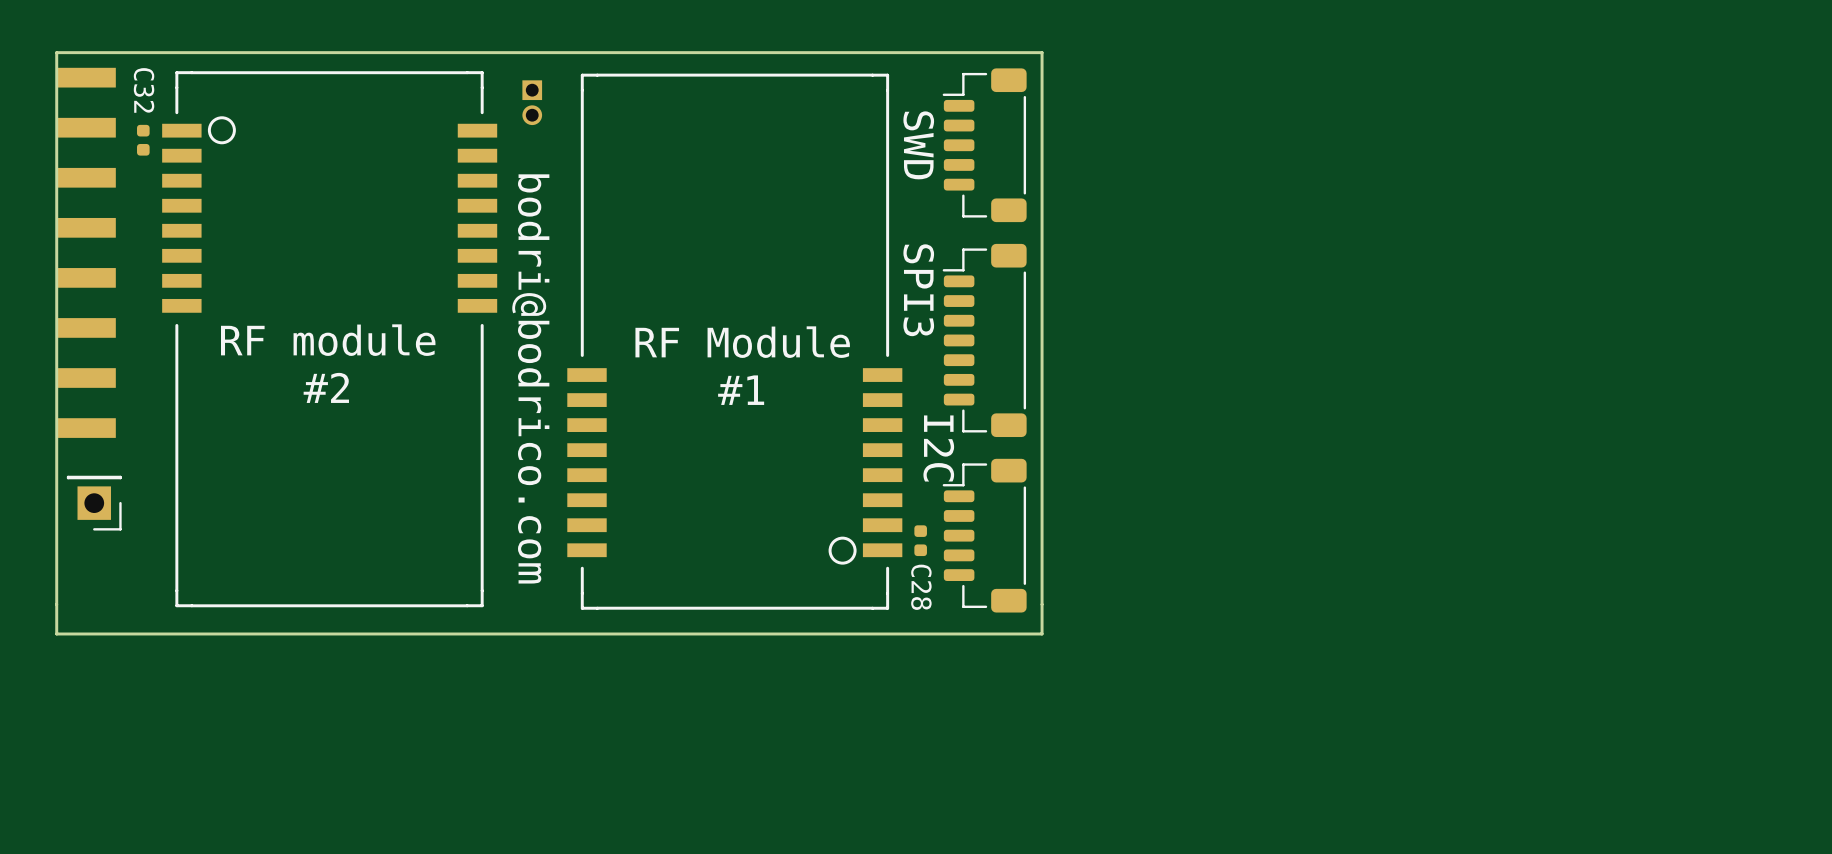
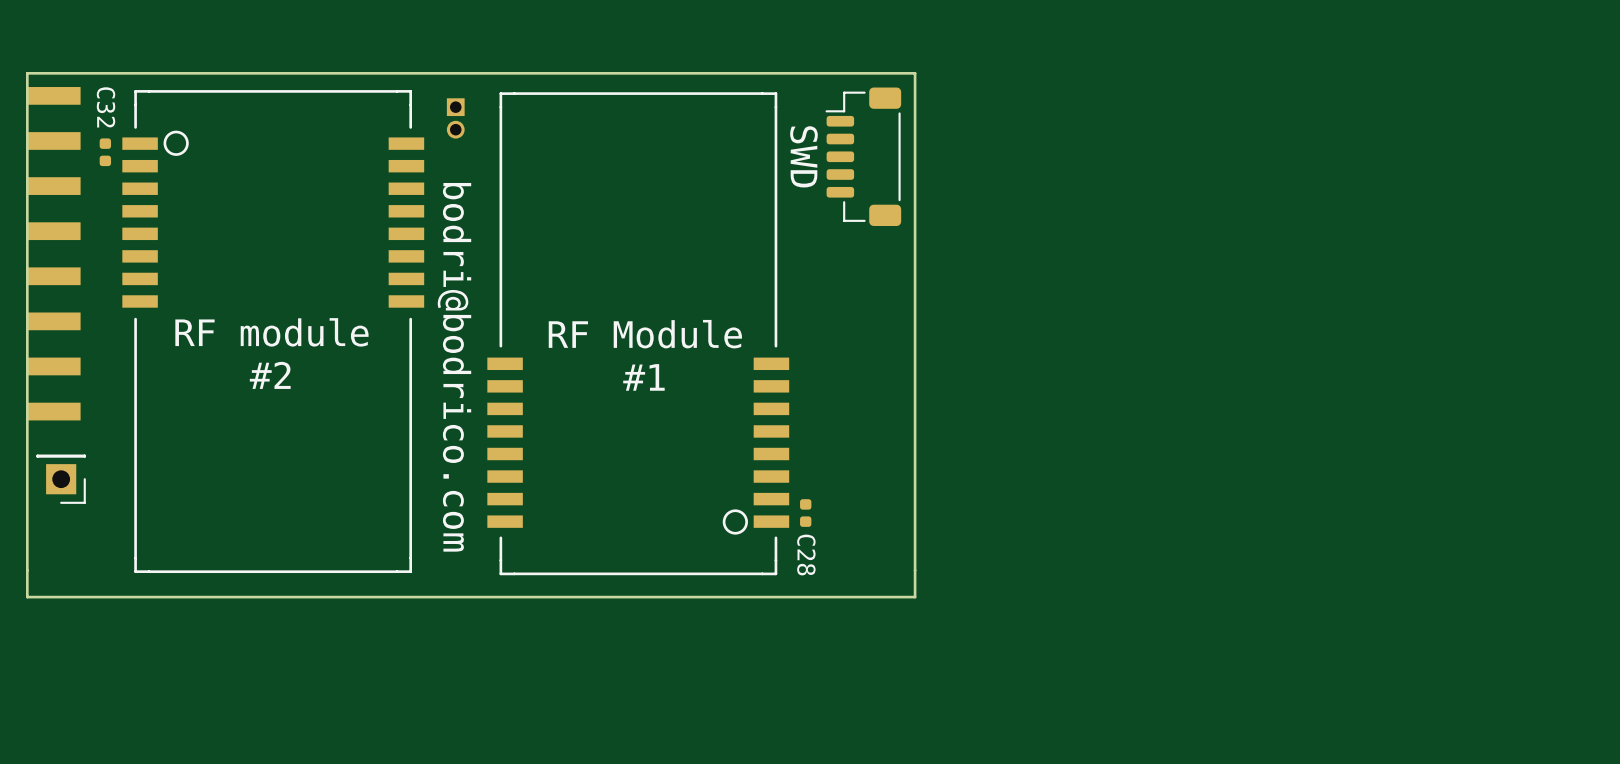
text: SPI3 (918, 290) -> none
part: (984, 340) -> none
text: I2C (938, 448) -> none
part: (984, 535) -> none

